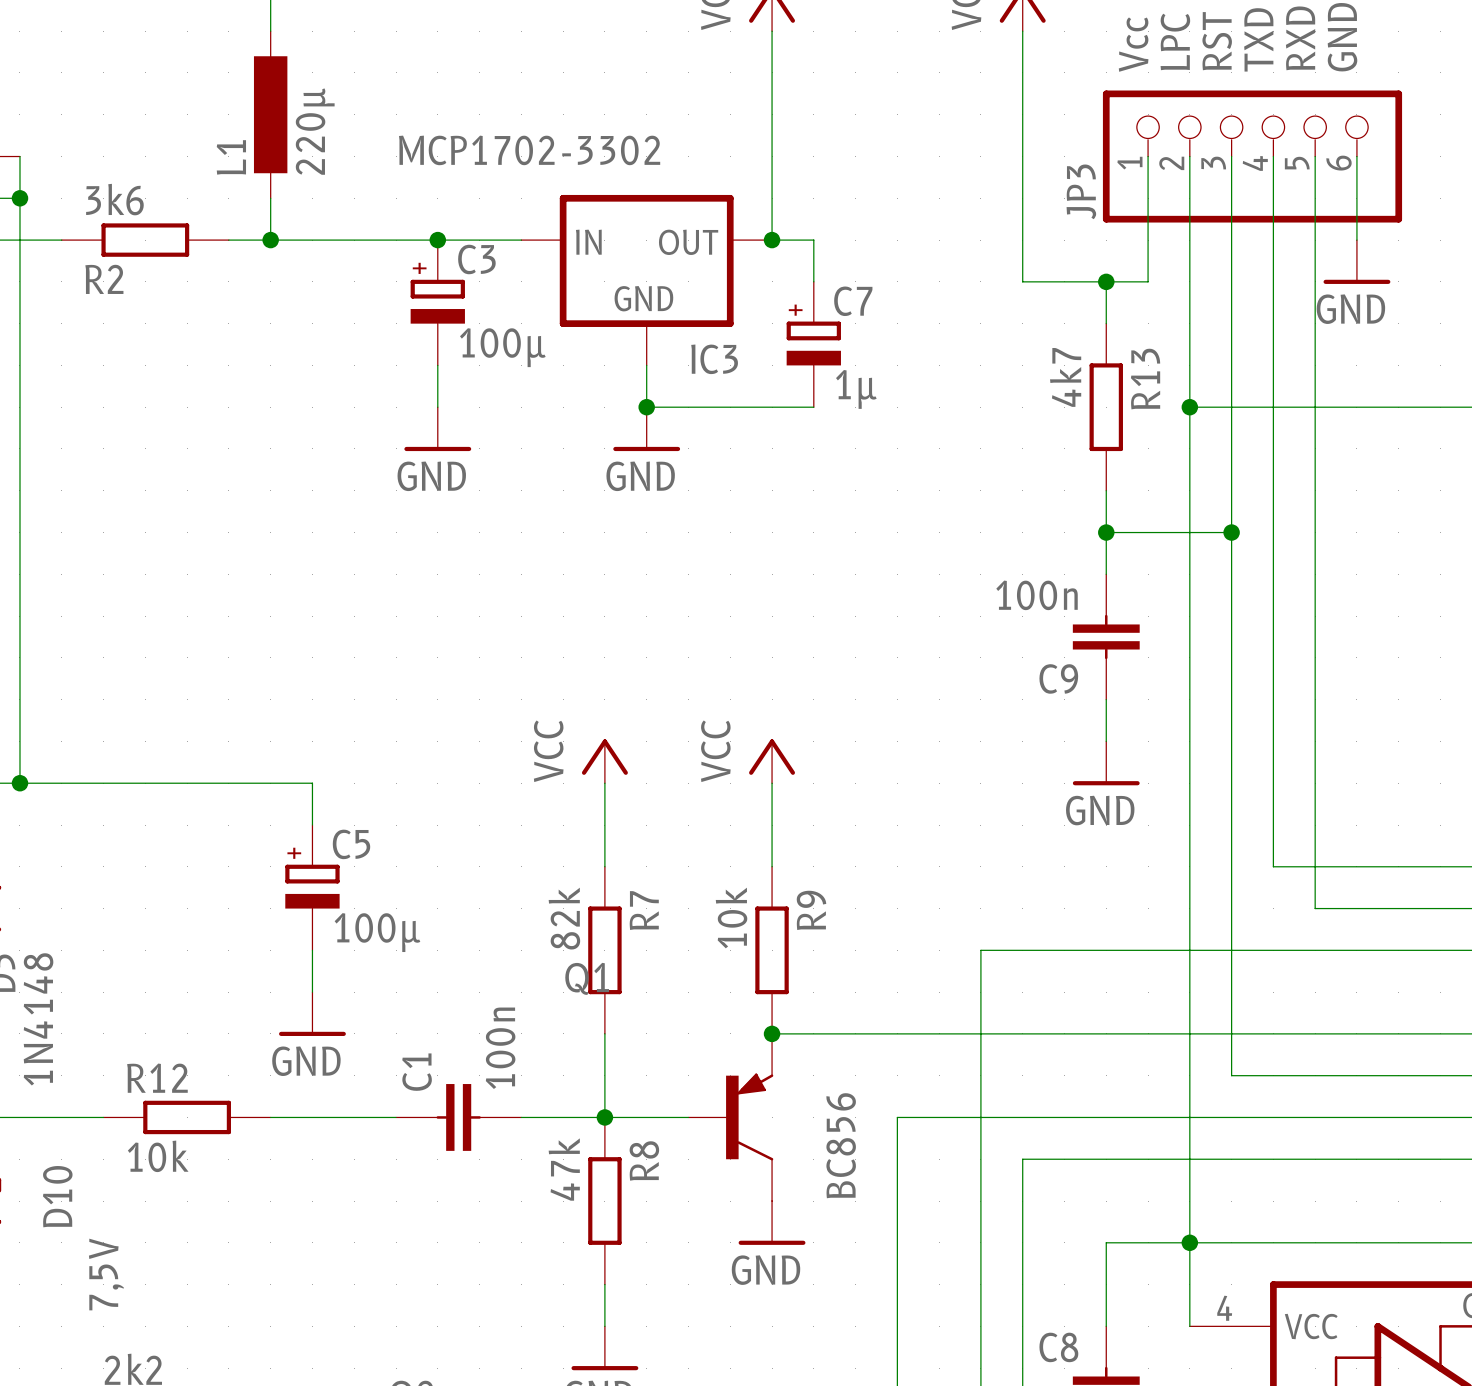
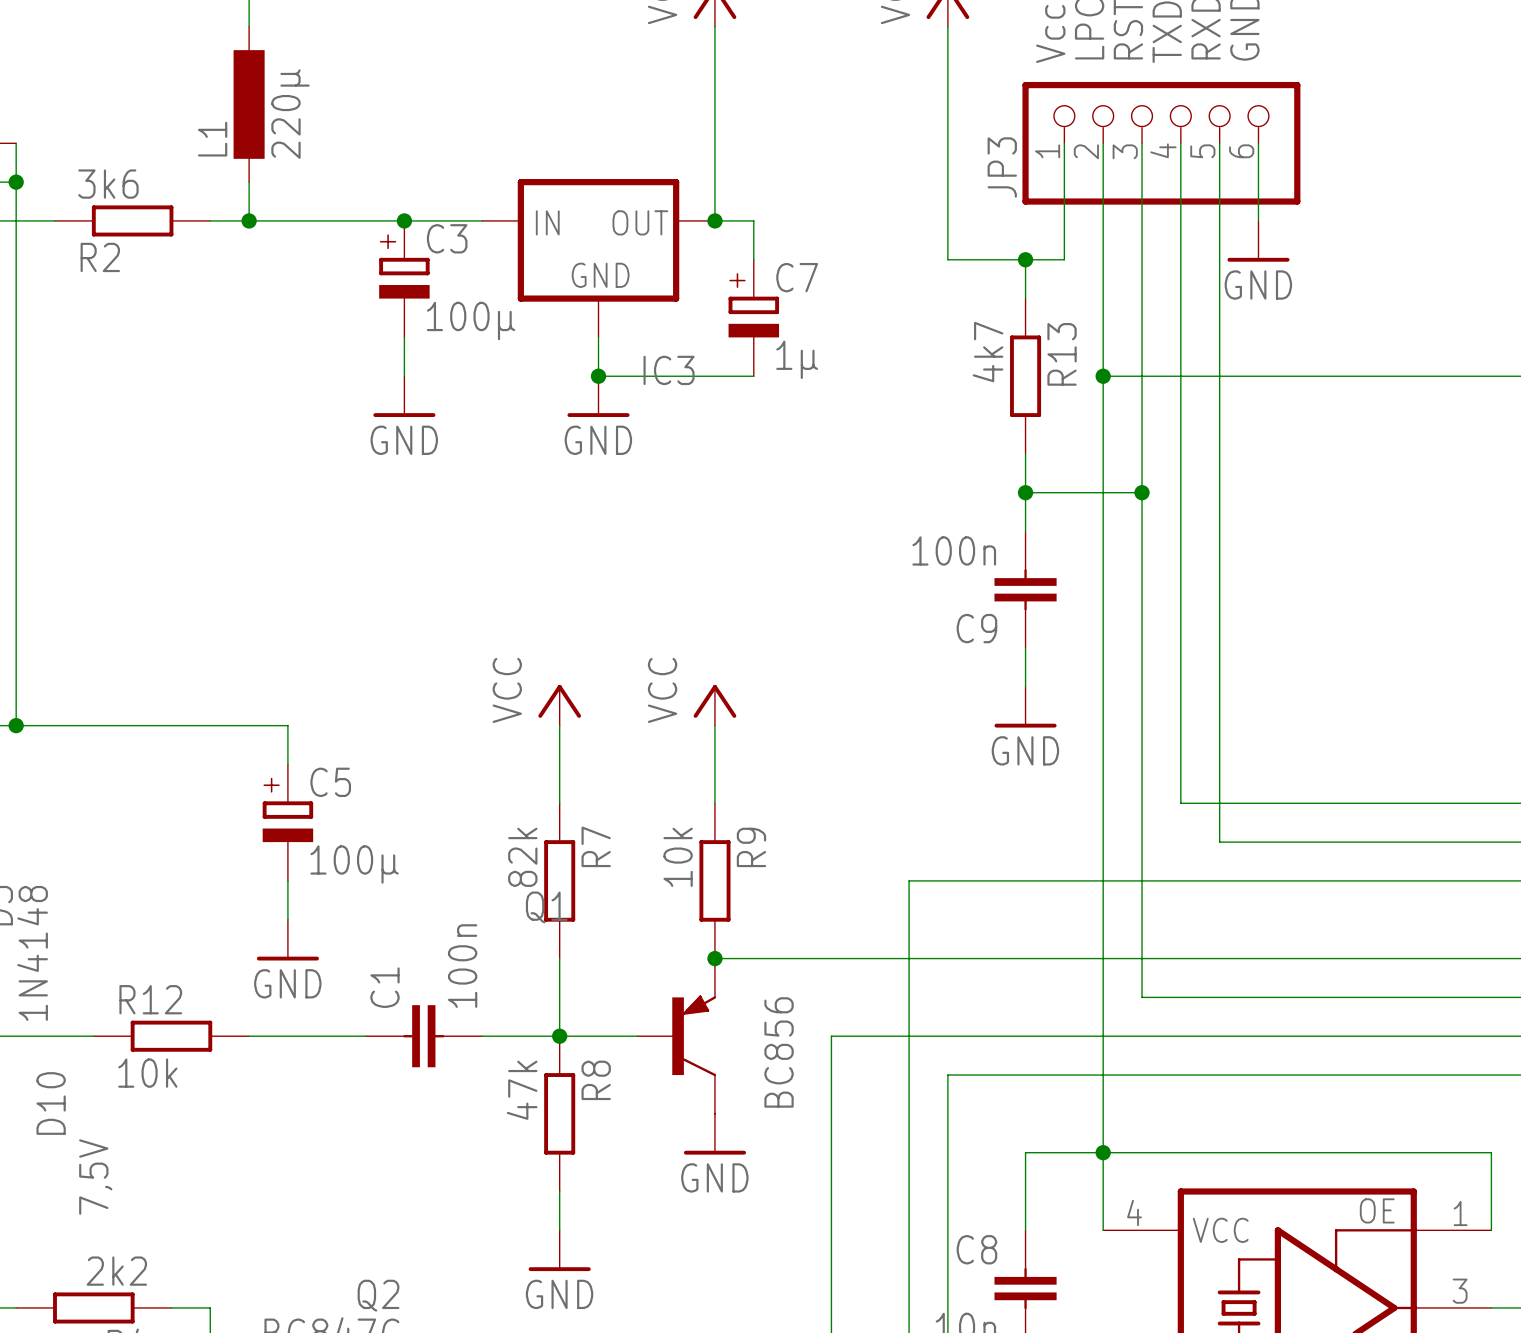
IC3 value: MCP1702-3302 (529, 150) -> none
IC3 name position: IC3 (714, 359) -> IC3 (669, 370)

